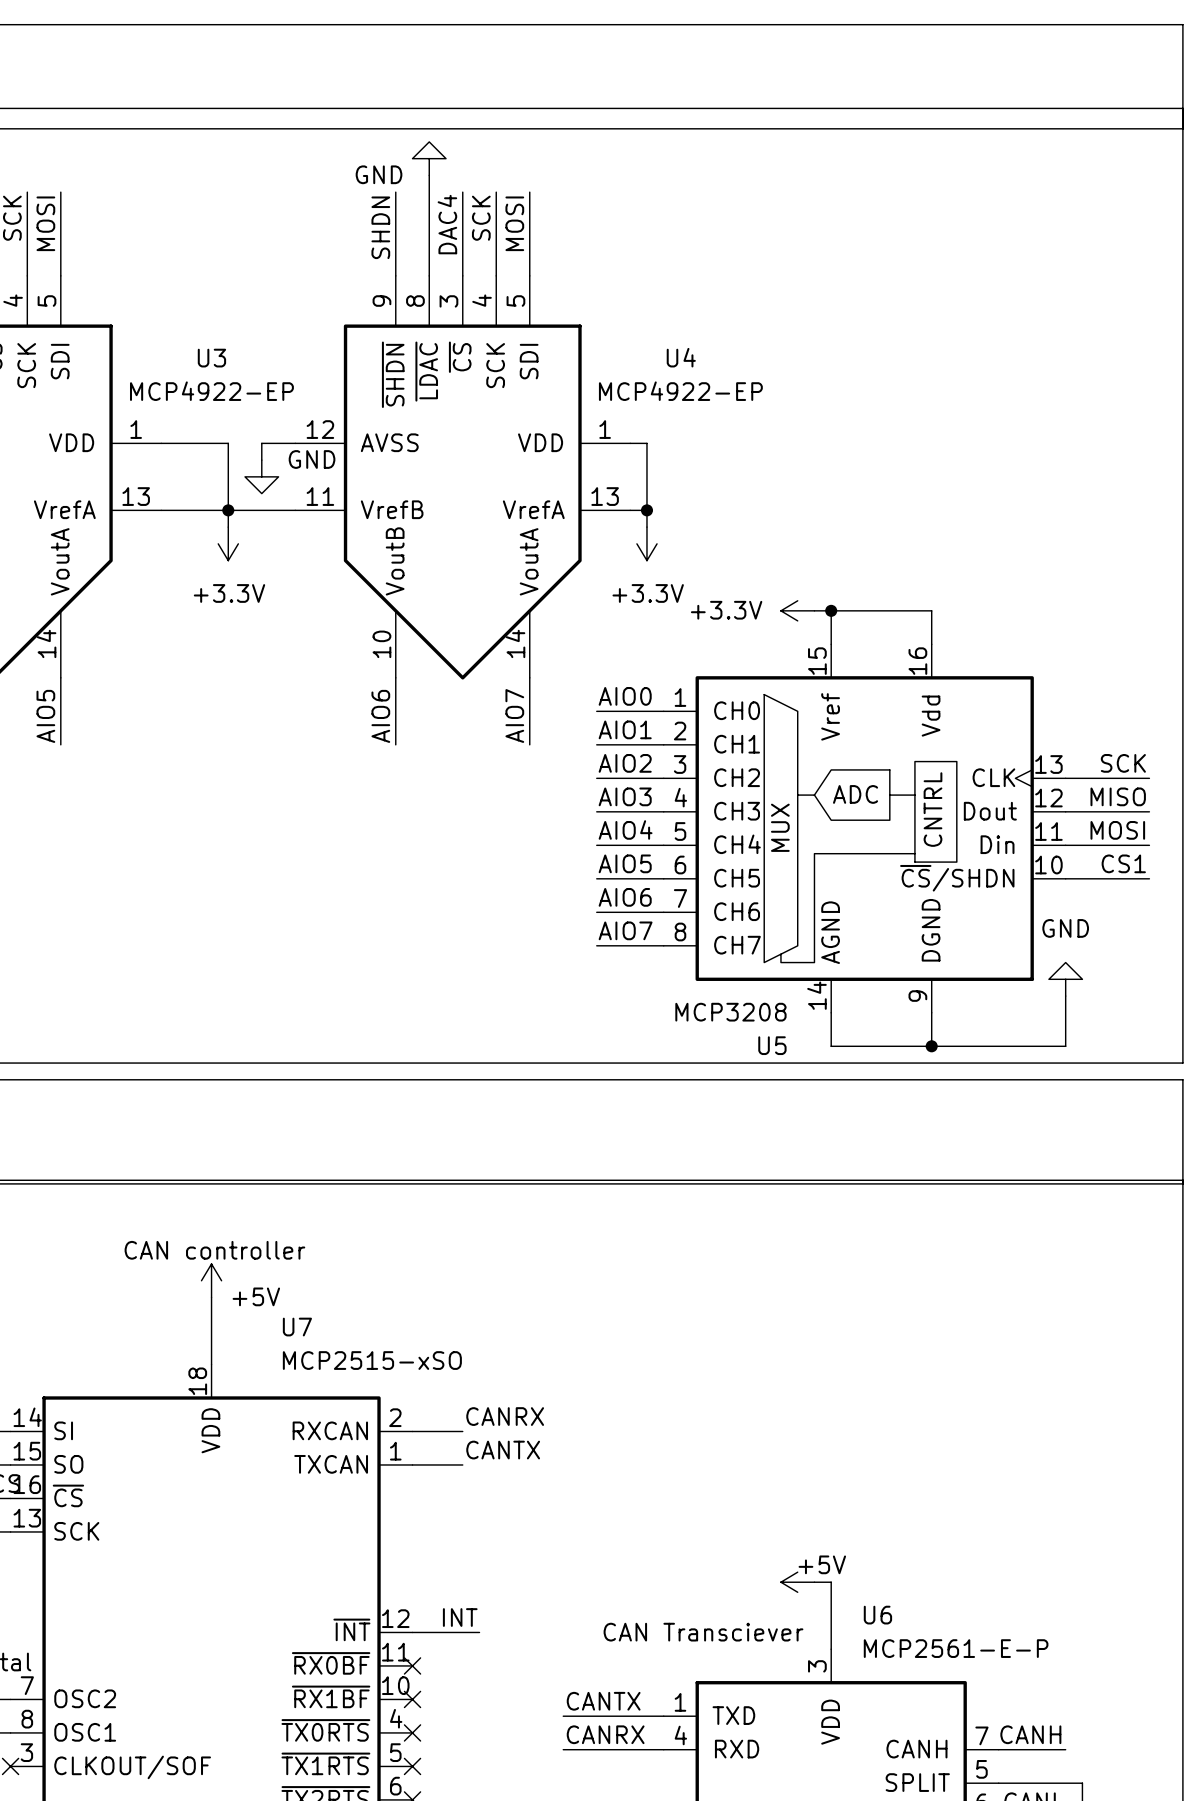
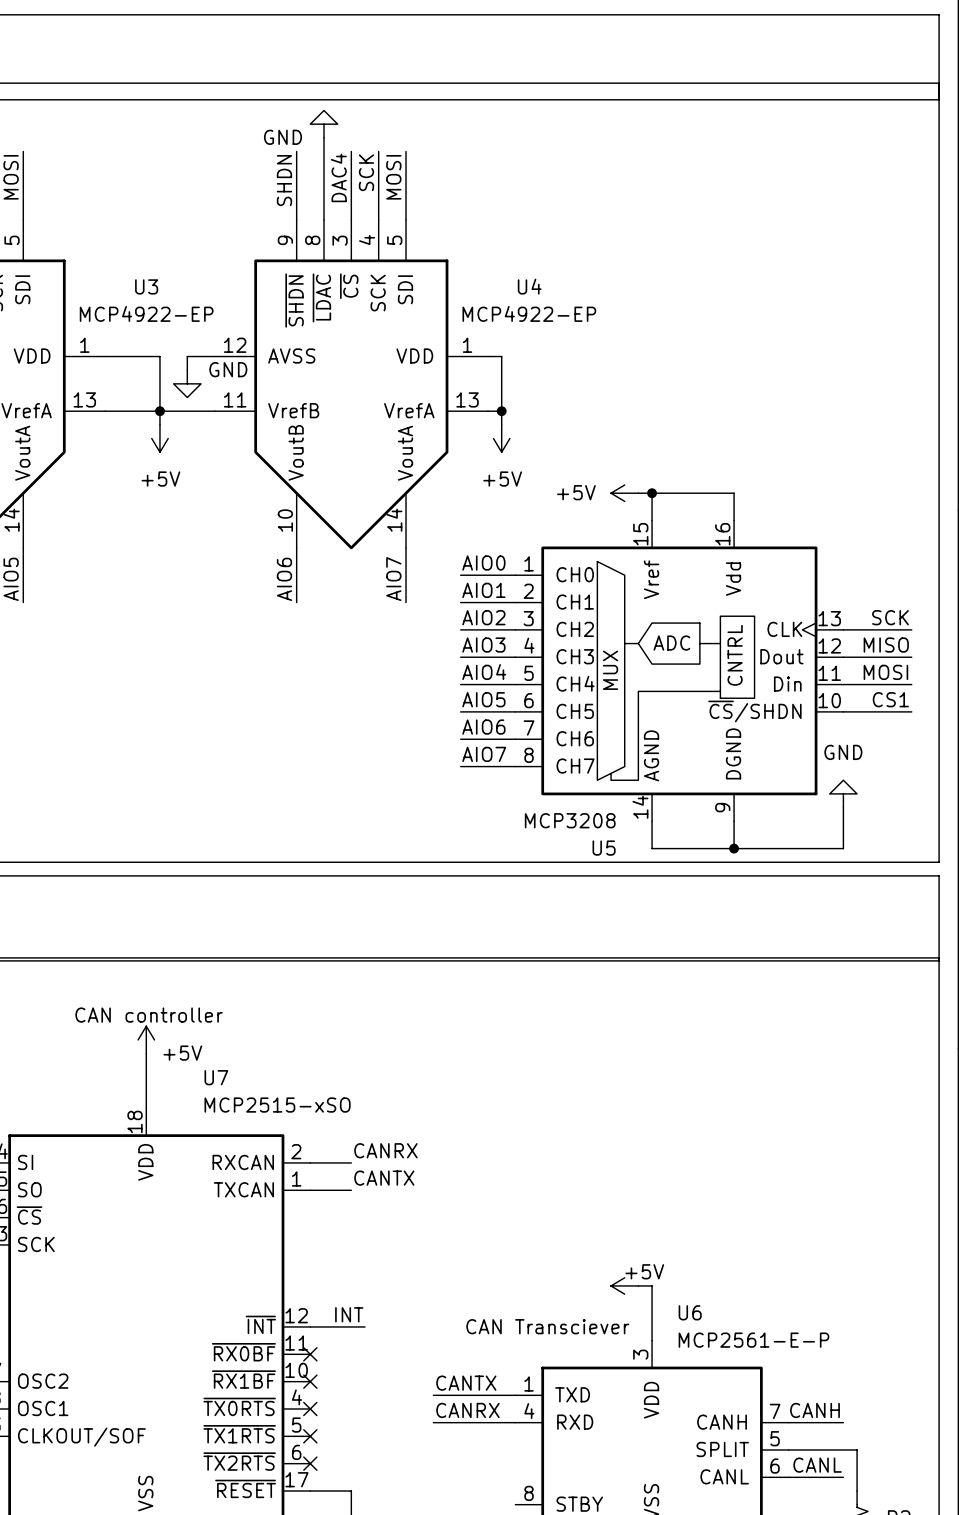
power symbol: +3.3V (228, 543) -> +5V (159, 438)
power symbol: +3.3V (646, 543) -> +5V (501, 438)
power symbol: +3.3V (797, 610) -> +5V (624, 493)

